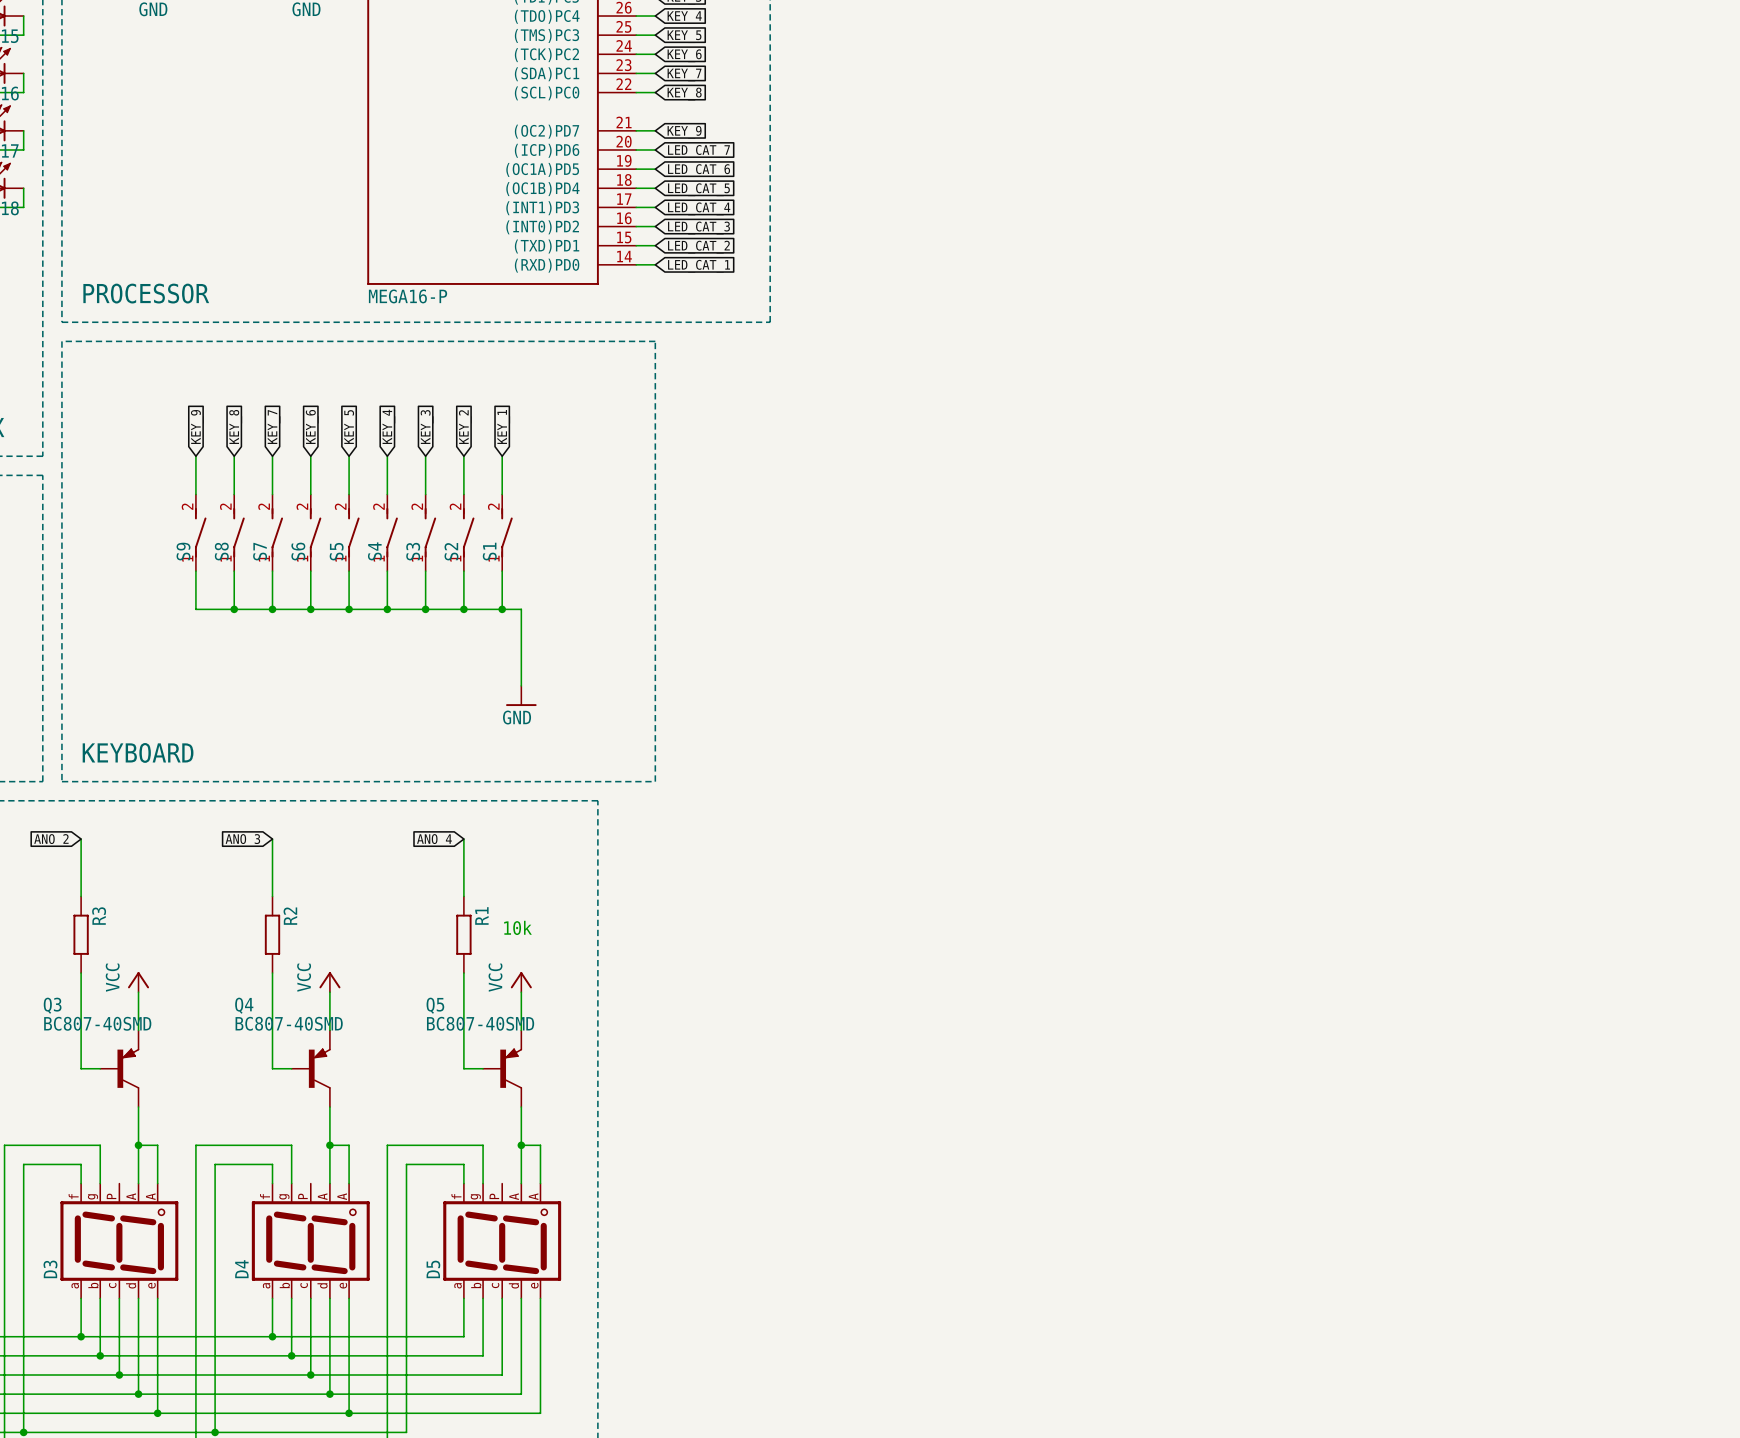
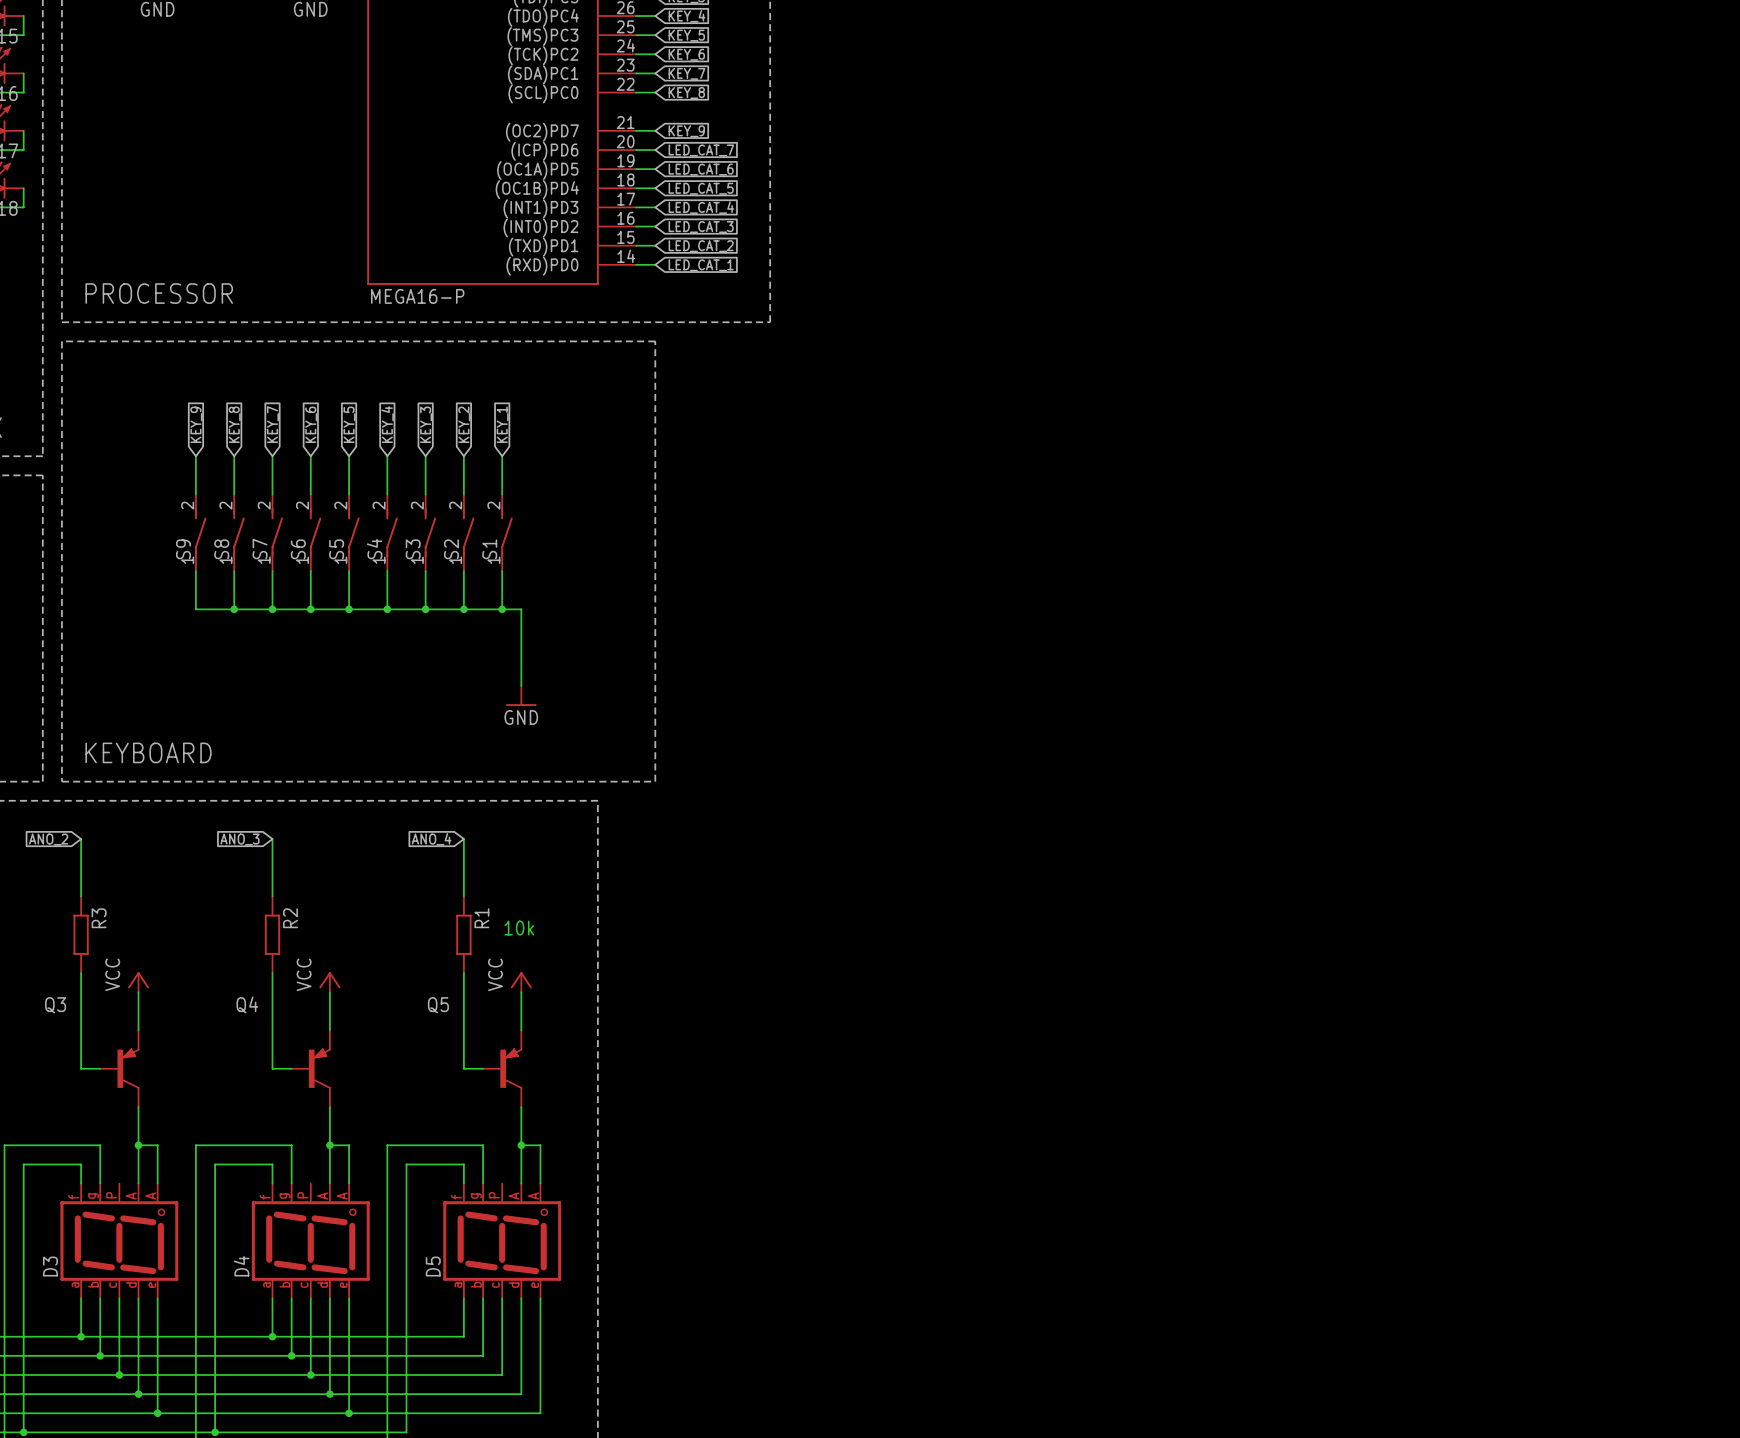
Q3 value: BC807-40SMD (97, 1023) -> none
Q4 value: BC807-40SMD (289, 1023) -> none
Q5 value: BC807-40SMD (480, 1023) -> none

